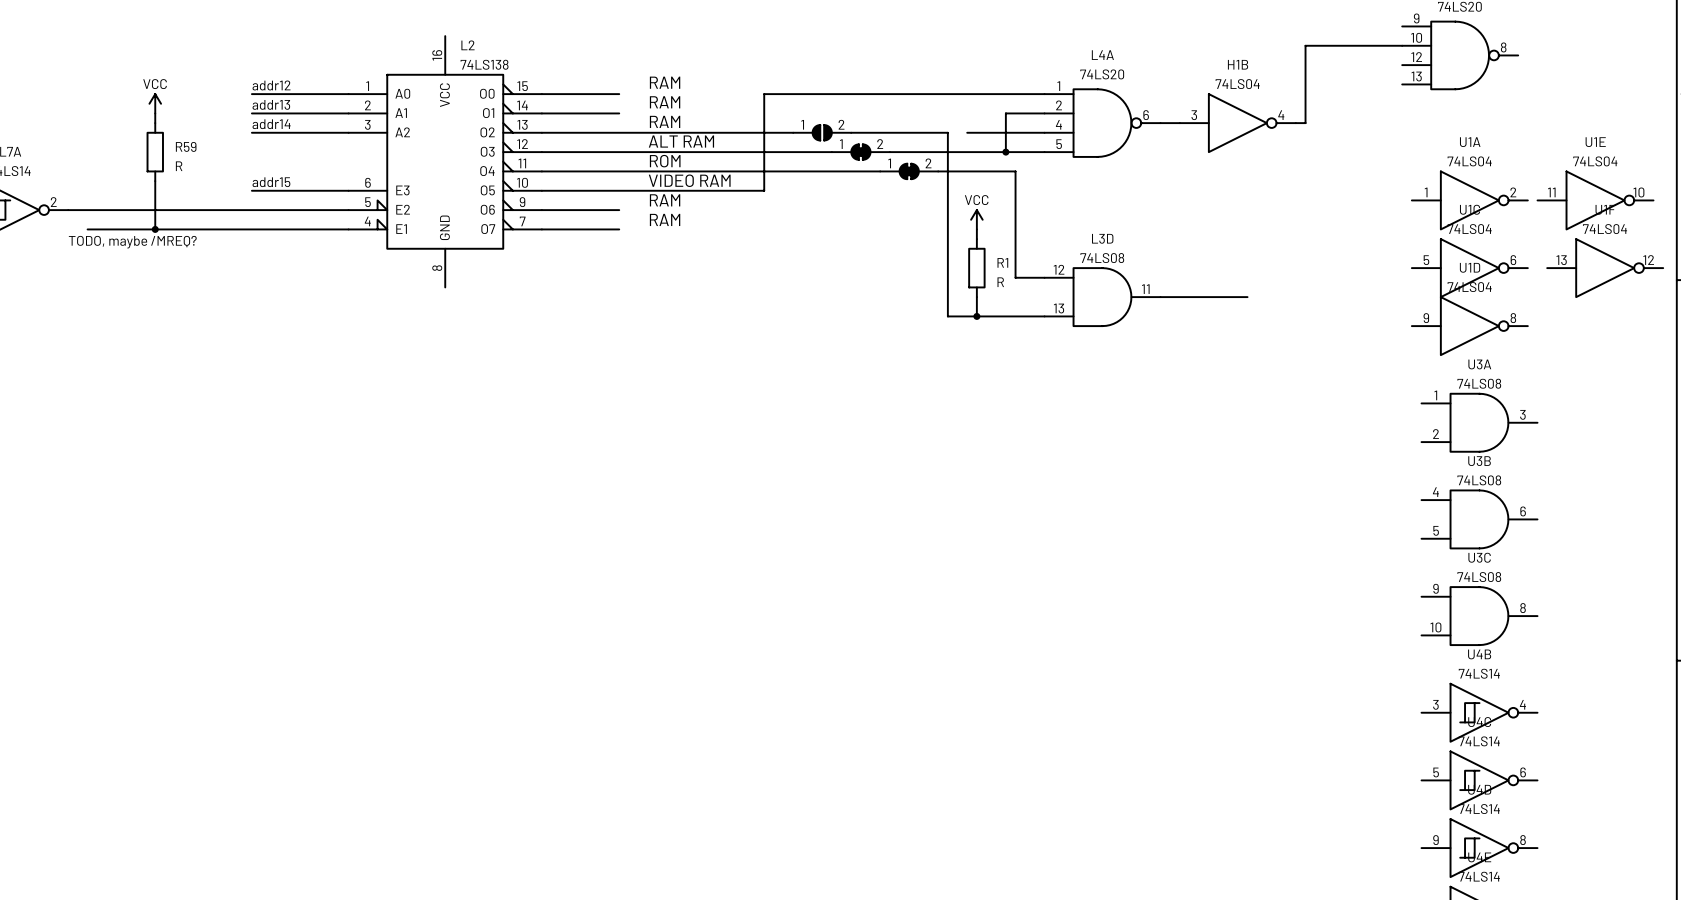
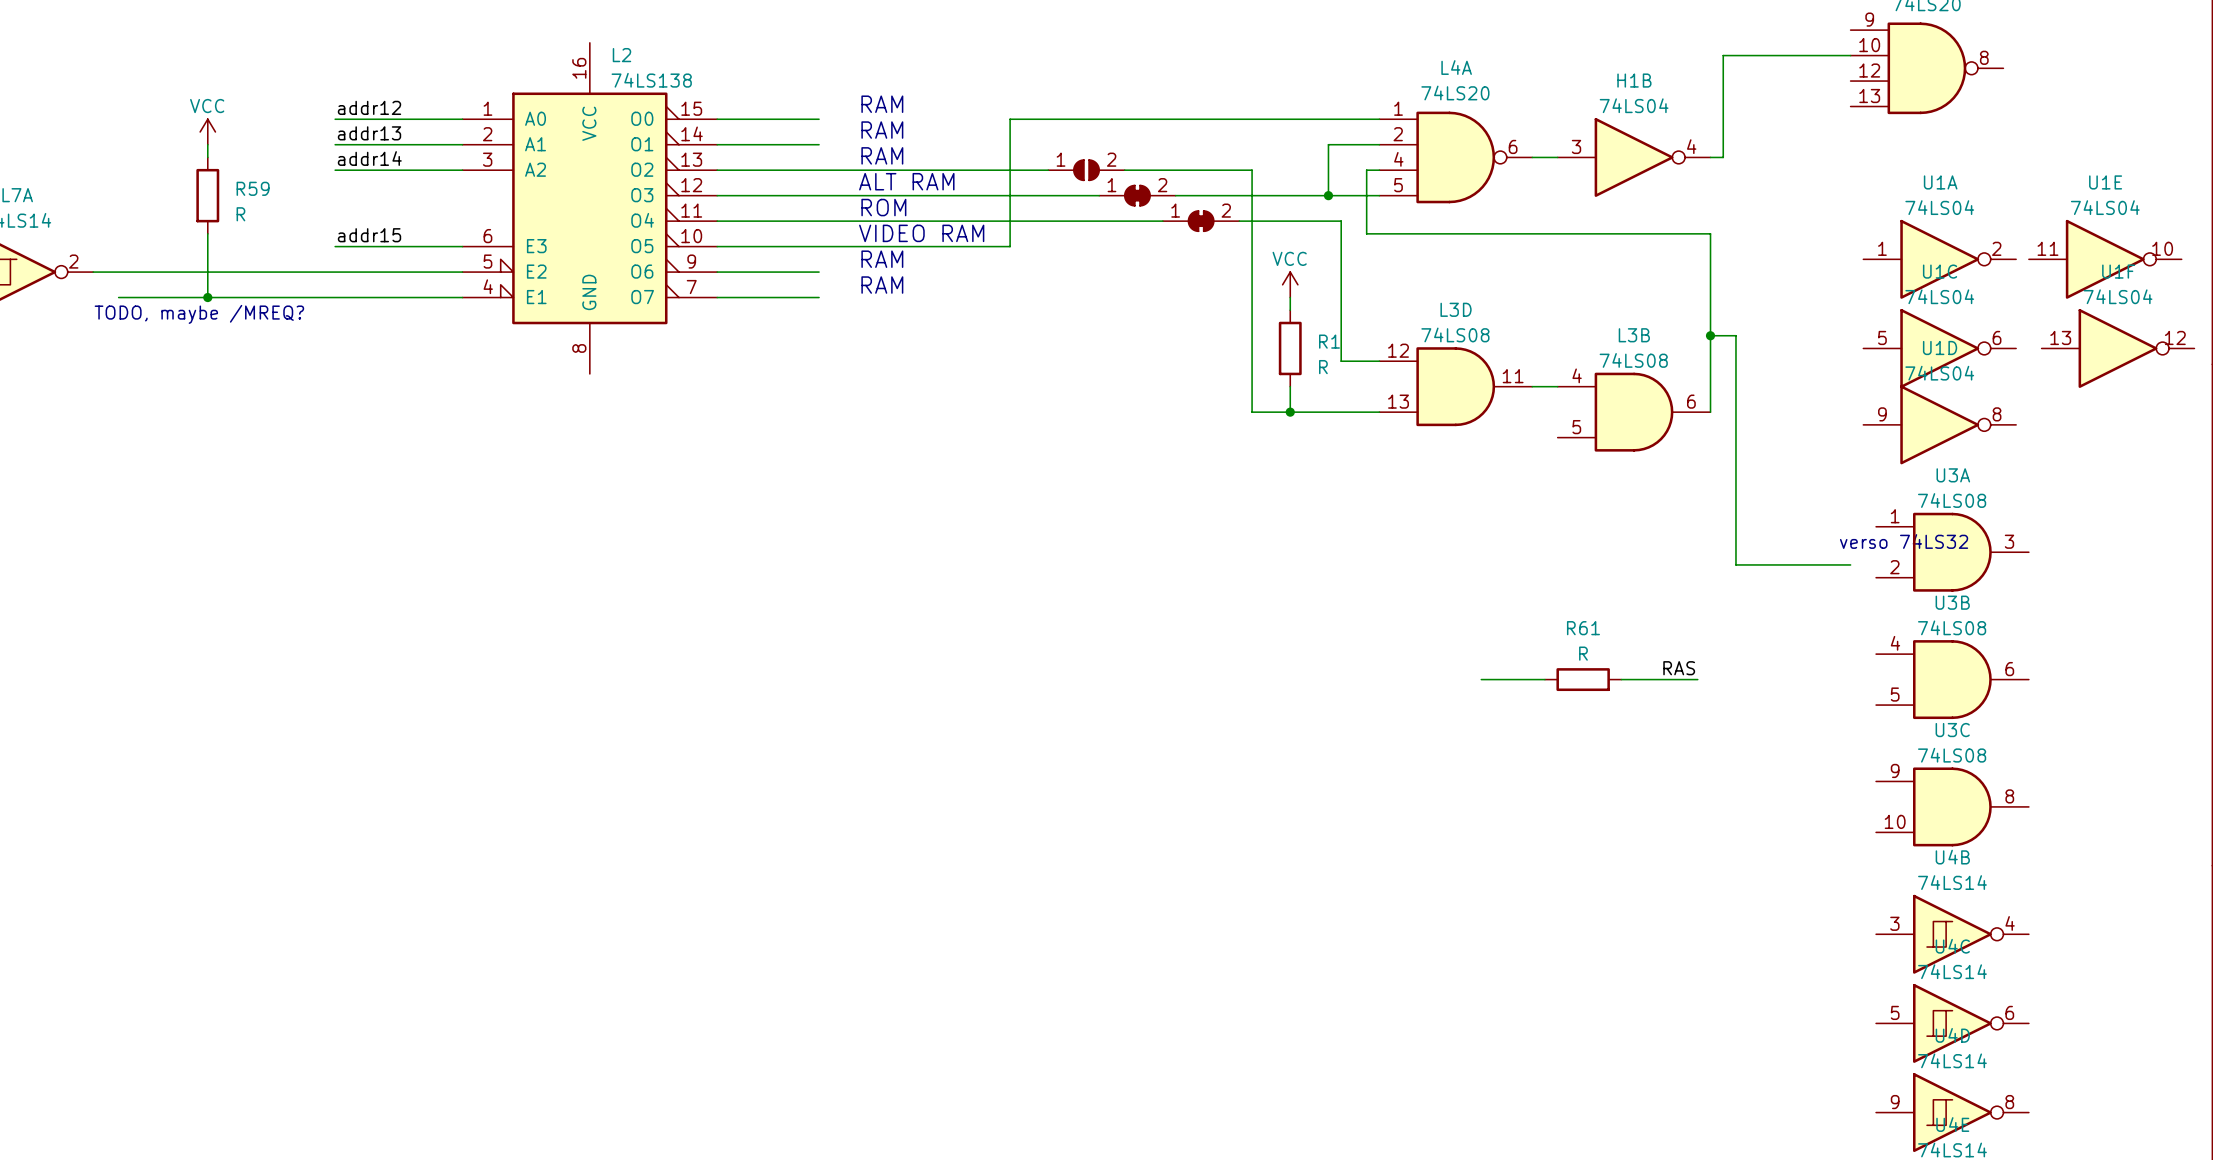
wire: (967, 132) (1034, 132) -> (1710, 412) (1710, 233) (1366, 233) (1366, 170)
wire: none -> (1710, 335) (1735, 335) (1735, 564) (1850, 564)
junction: none -> (1710, 335)
L3B: none -> 74LS08 (1634, 412)
text: none -> verso 74LS32 (1904, 541)
label: none -> RAS (1679, 668)
wire: none -> (1481, 679) (1544, 679)
R61: none -> R (1583, 679)
wire: none -> (1621, 679) (1697, 679)

